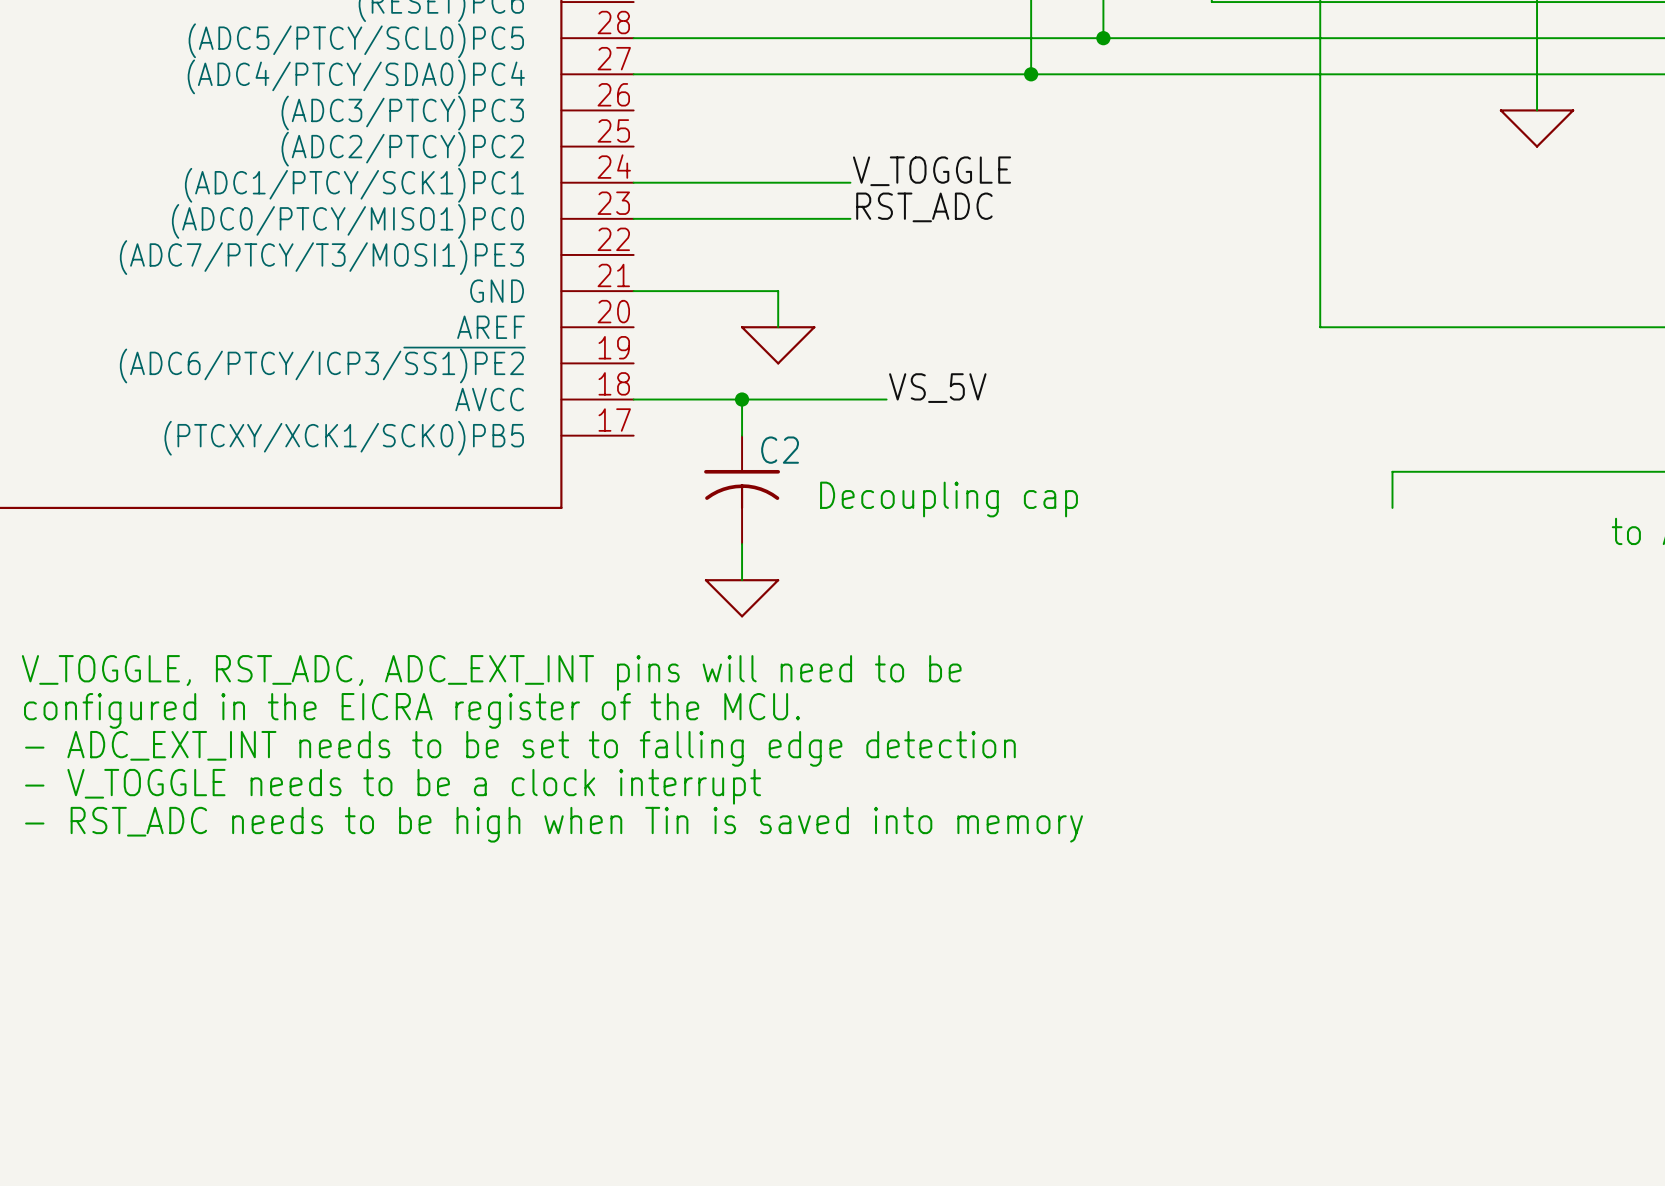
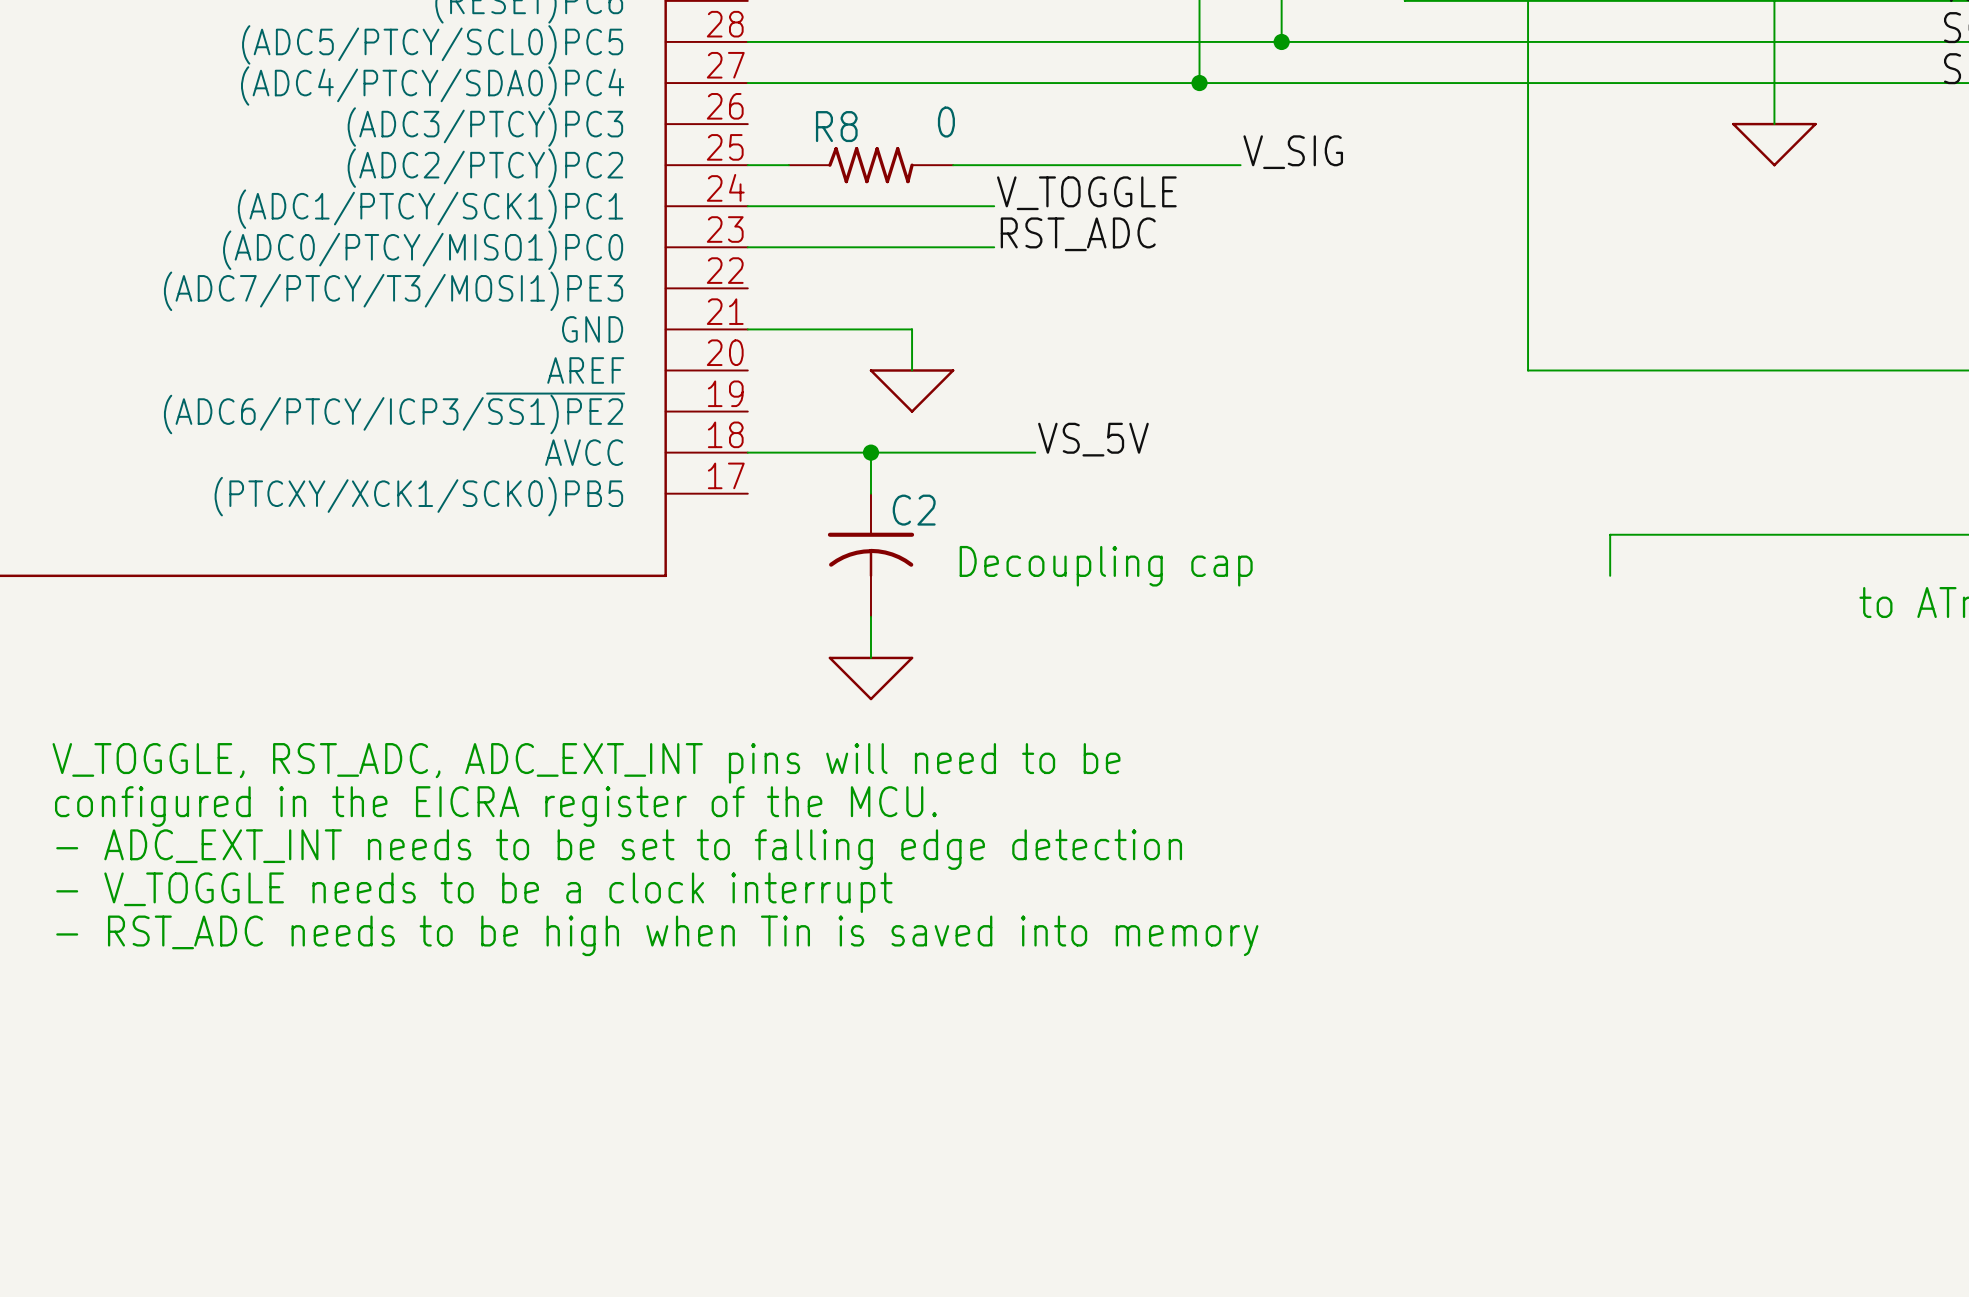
label: none -> V_SIG (1293, 152)
wire: none -> (747, 165) (788, 165)
R8: none -> 0 (870, 165)
wire: none -> (953, 165) (1240, 165)

